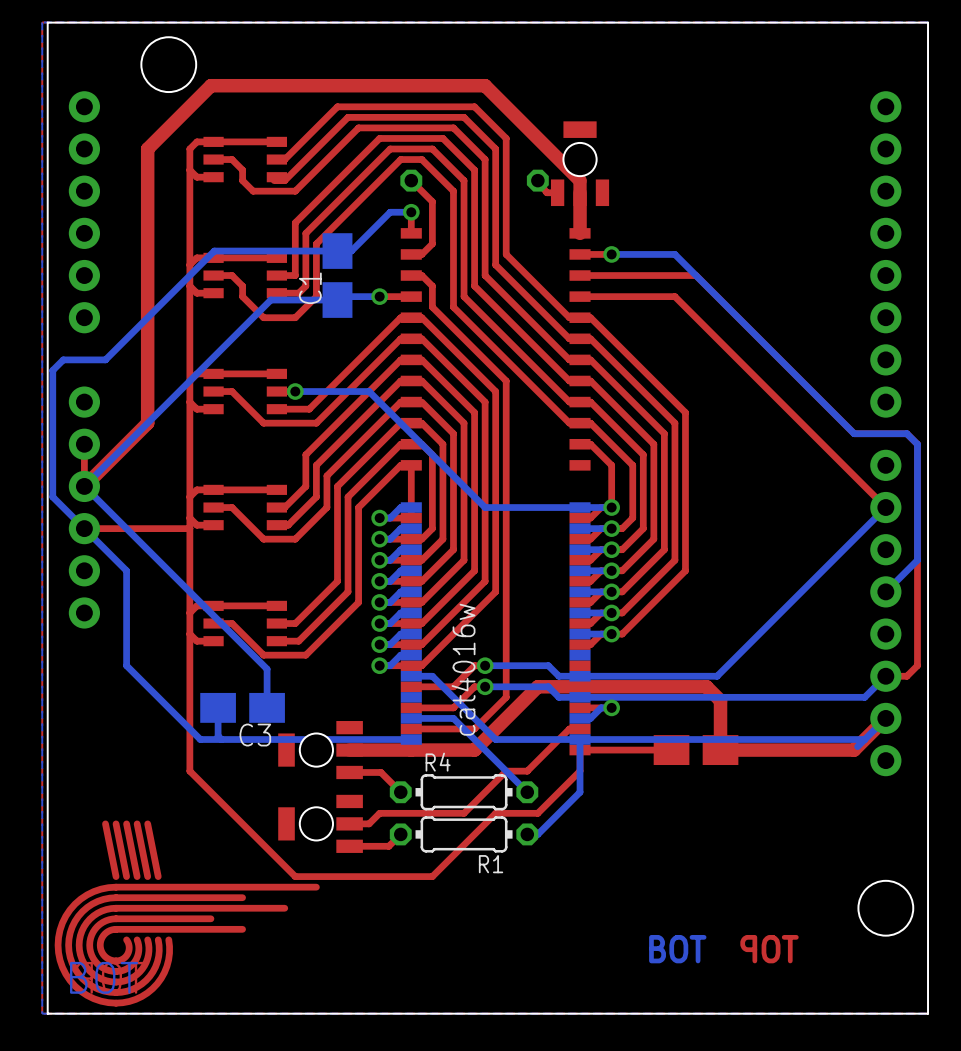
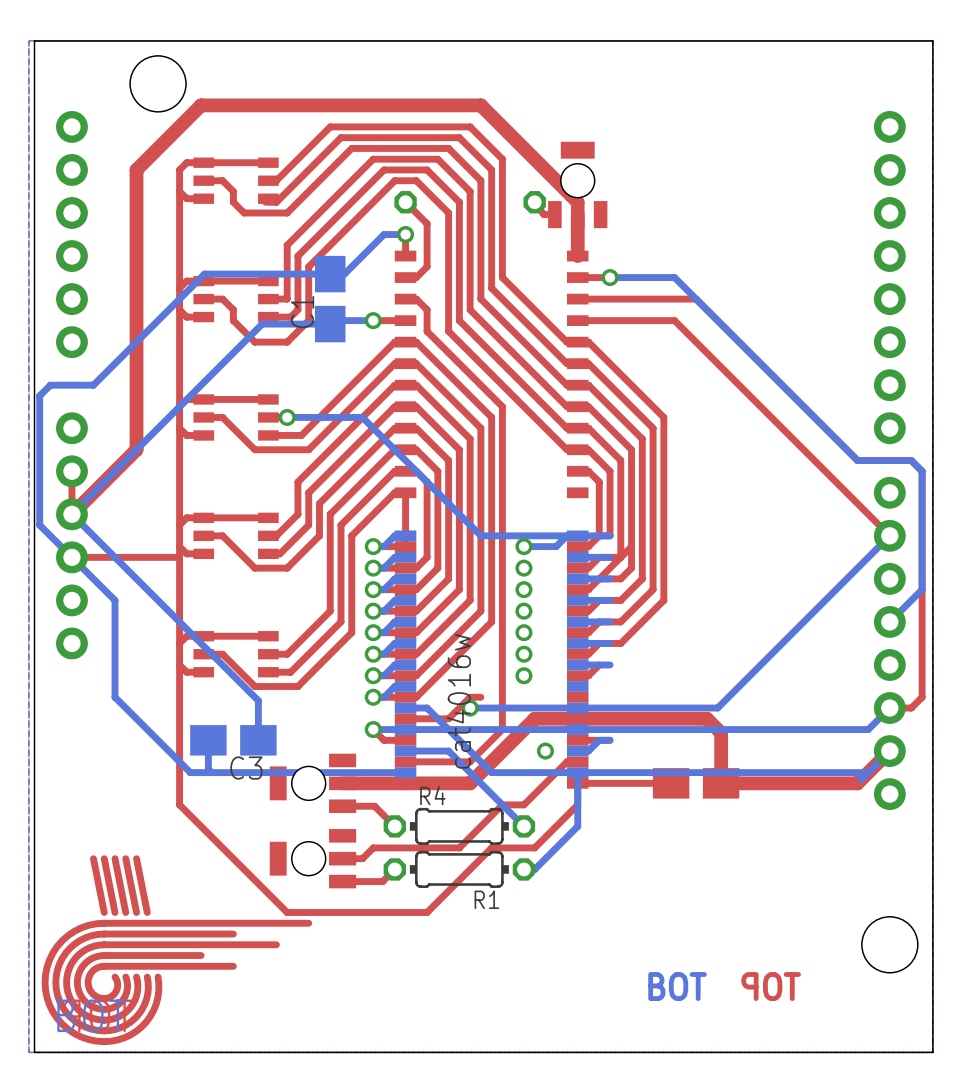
top track: (664, 391) (685, 412) (685, 570) (622, 634) (601, 634) -> (663, 417) (663, 460)
top track: (653, 402) (674, 423) (674, 560) (664, 570) -> (663, 578) (663, 600)
top track: (643, 412) (664, 433) -> (642, 438) (642, 482)
top track: (632, 423) (653, 444) -> (653, 428) (653, 471)
top track: (622, 433) (643, 454) -> (620, 460) (620, 557) (599, 578)
top track: (611, 444) (632, 465) -> (631, 449) (631, 492)
top track: (601, 454) (611, 465) -> (610, 471) (610, 492)
top track: none -> (599, 482) (599, 535)
bottom track: none -> (566, 535) (556, 546) (523, 546)
via: (611, 507) -> none
via: none -> (523, 546)
via: (611, 528) -> none
top track: (643, 528) (632, 539) -> (631, 546) (631, 568)
via: none -> (523, 568)
top track: (653, 539) (643, 549) -> (642, 557) (642, 578)
via: (611, 549) -> none
top track: (664, 549) (653, 560) -> (653, 568) (653, 589)
via: none -> (523, 589)
via: (611, 570) -> none
via: none -> (523, 611)
via: (611, 591) -> none
via: none -> (523, 632)
via: (611, 612) -> none
via: none -> (523, 654)
via: (611, 634) -> none
via: none -> (523, 675)
bottom track: (485, 665) (548, 665) (558, 676) -> (470, 708) (556, 708)
via: (485, 665) -> none
via: none -> (470, 708)
top track: (485, 686) (474, 686) (453, 707) (411, 707) -> (373, 729) (384, 740) (405, 740)
bottom track: (485, 686) (548, 686) (558, 697) -> (373, 729) (556, 729)
via: (485, 686) -> none
via: none -> (373, 729)
via: (611, 707) -> none
via: none -> (545, 751)

